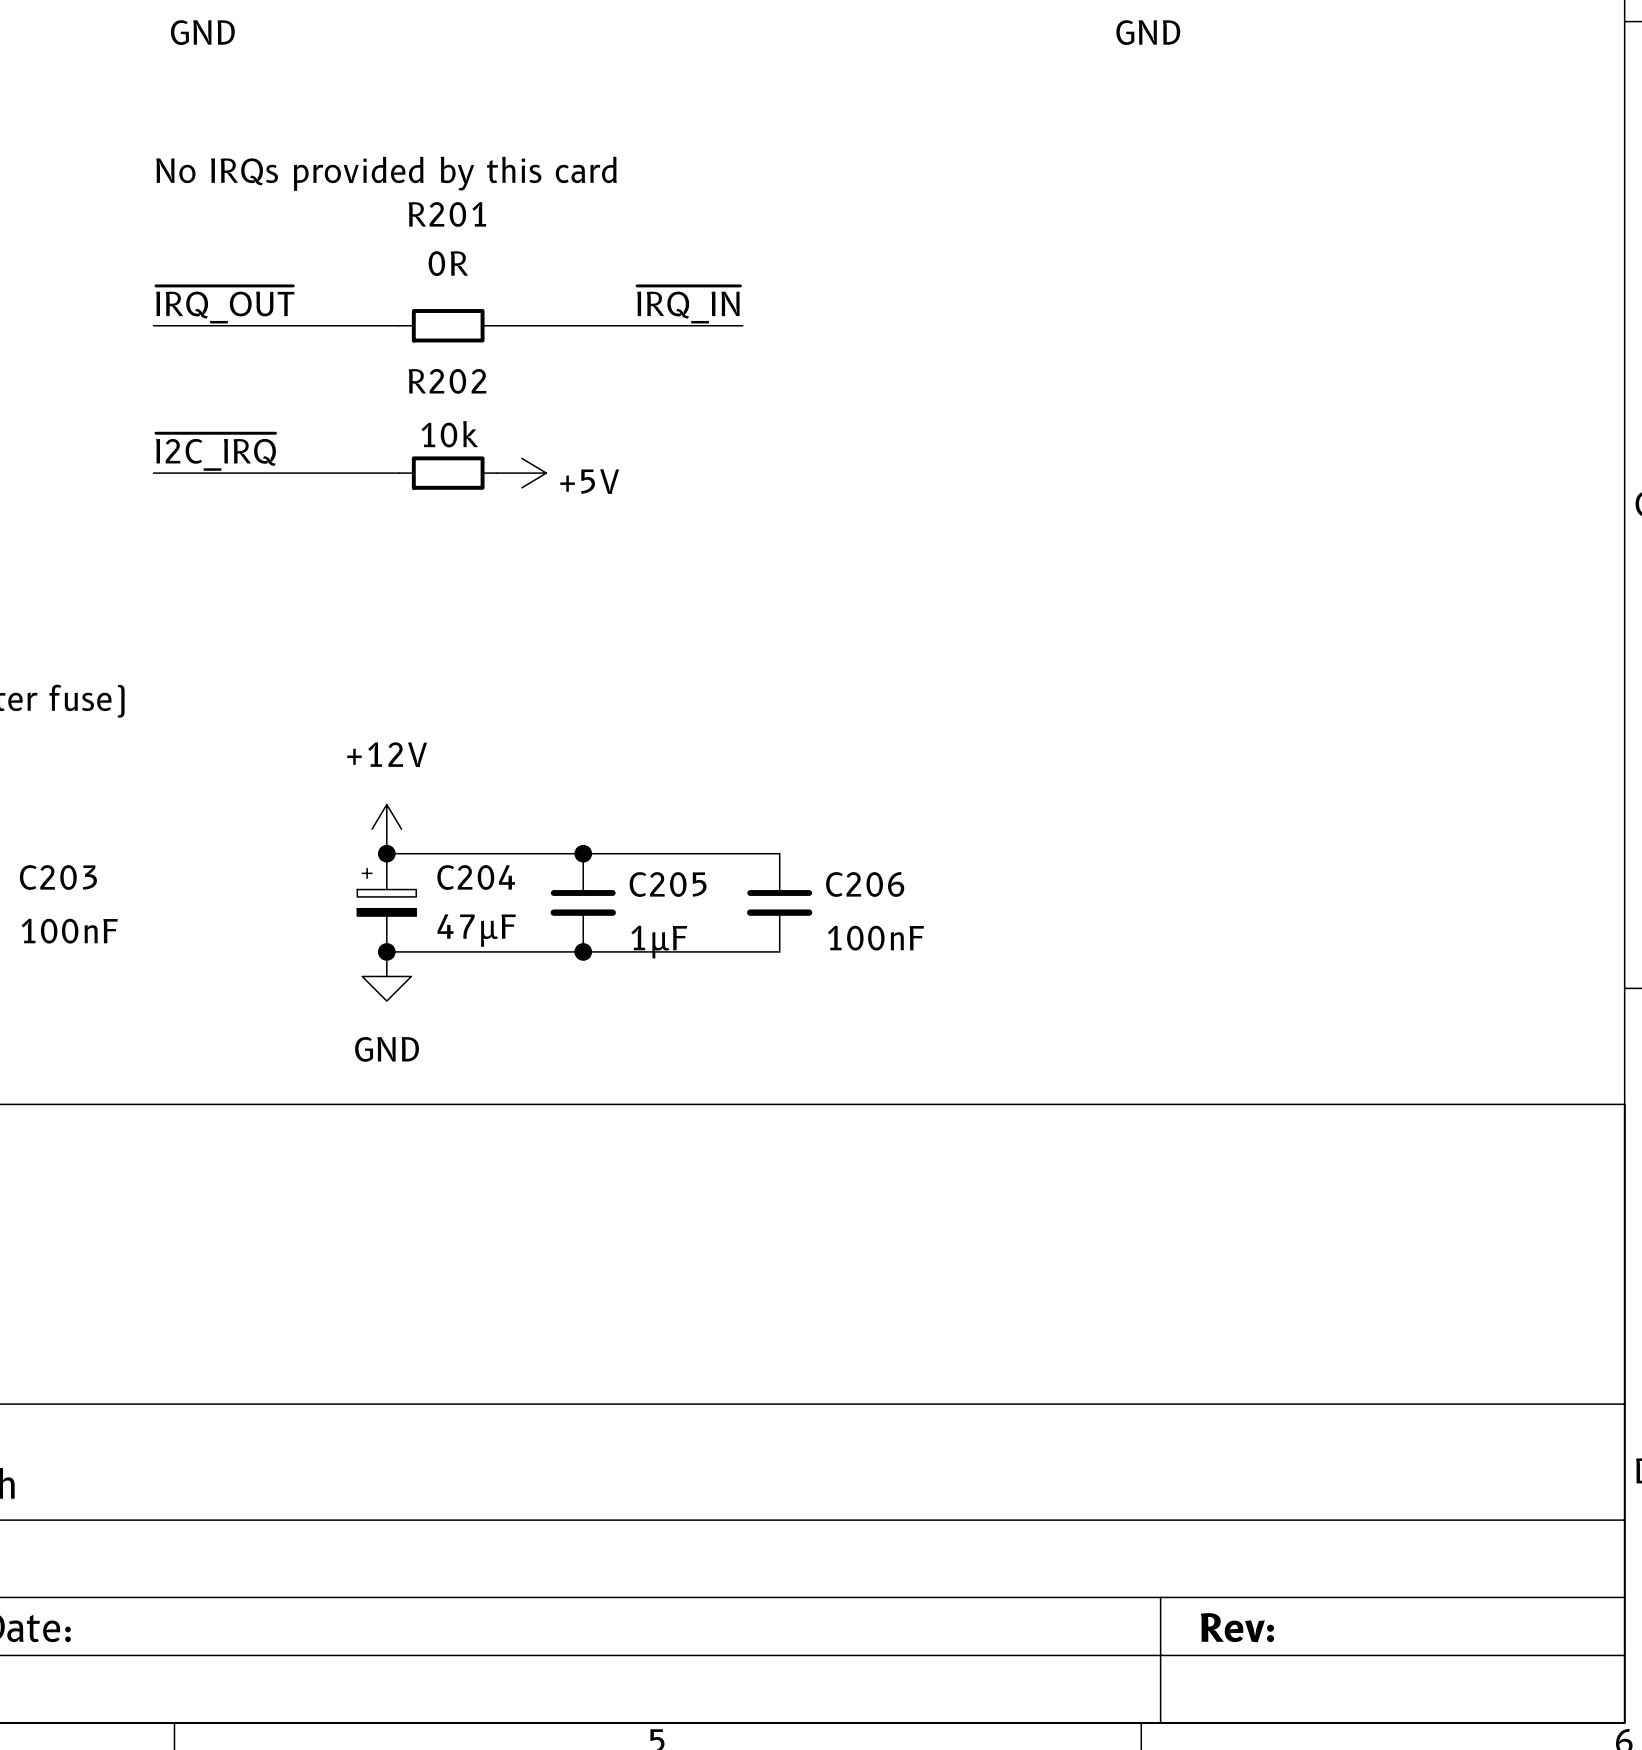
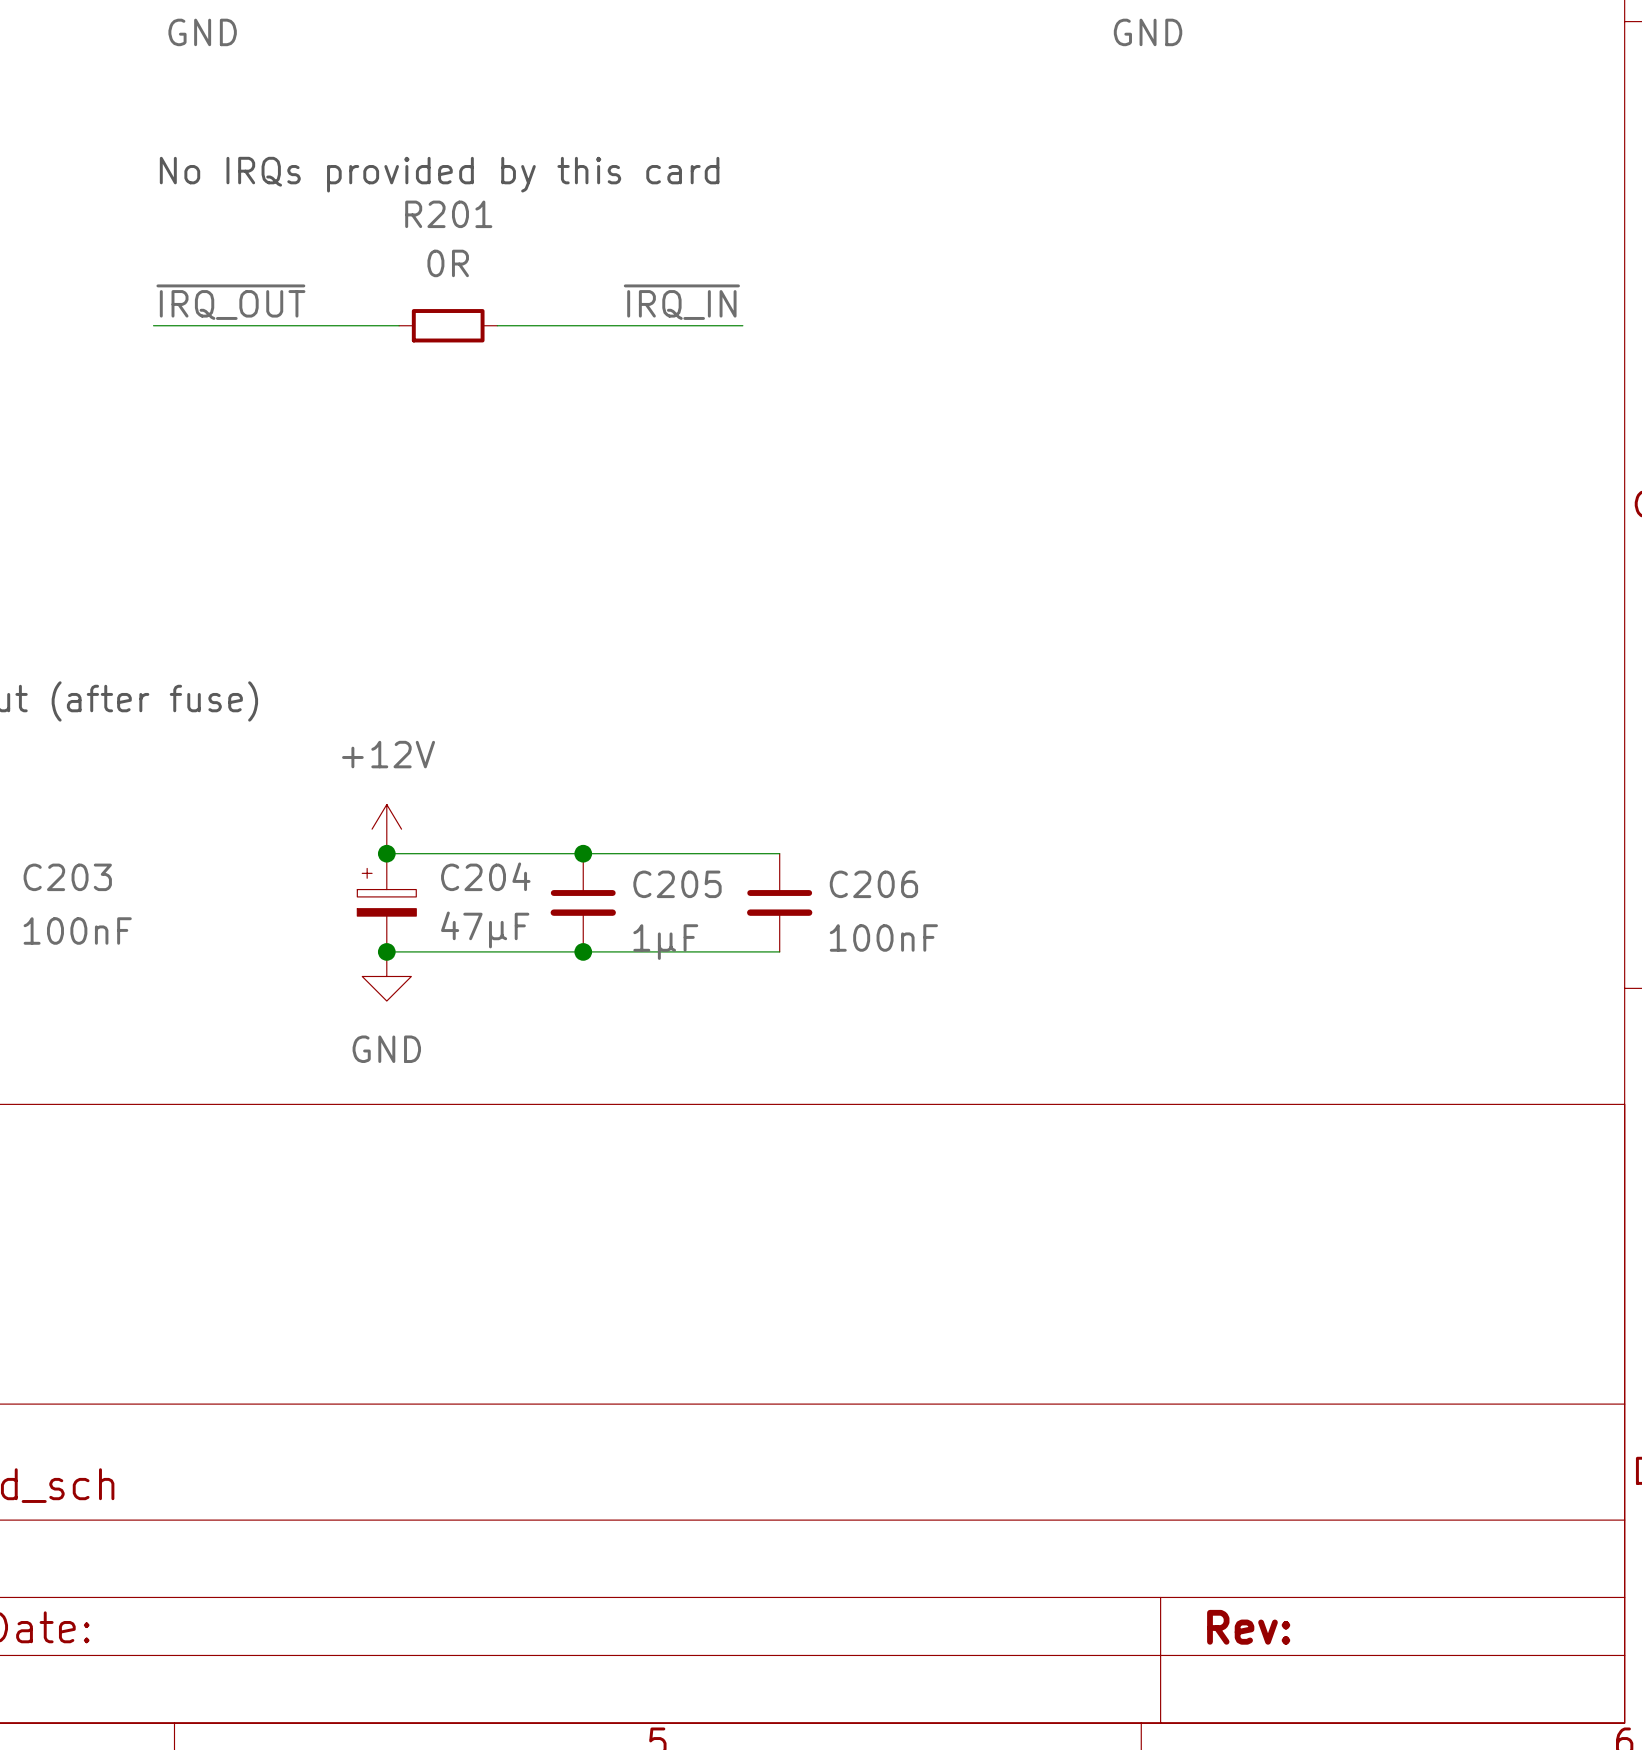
label: ~{I2C_IRQ} (215, 452) -> none
wire: (153, 473) (399, 473) -> none
R202: 10k (448, 473) -> none
power symbol: +5V (521, 473) -> none

